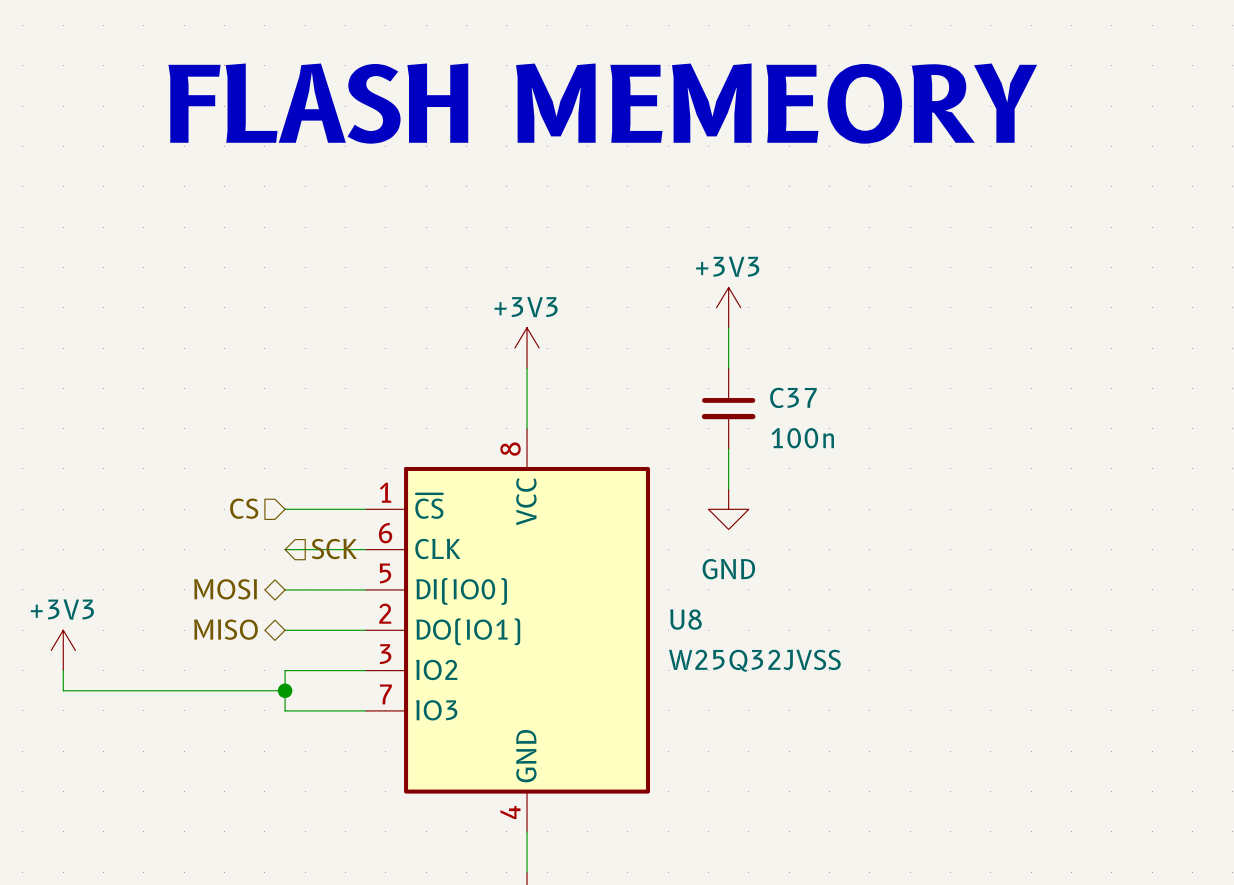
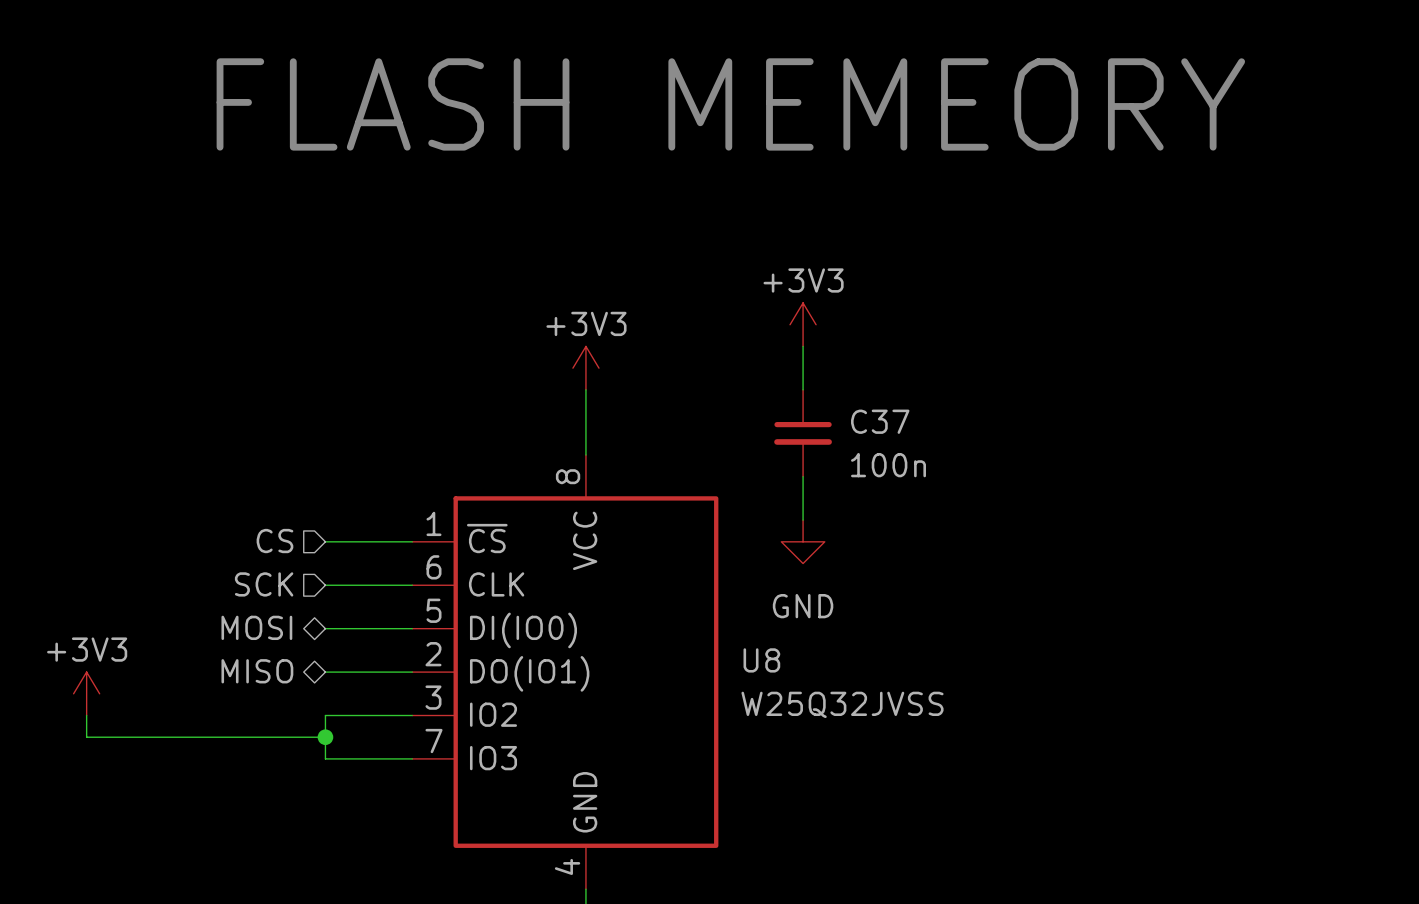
hierarchical label rotation: 0° (334, 549) -> 180° (264, 584)
hierarchical label position: SCK (334, 549) -> SCK (264, 584)

